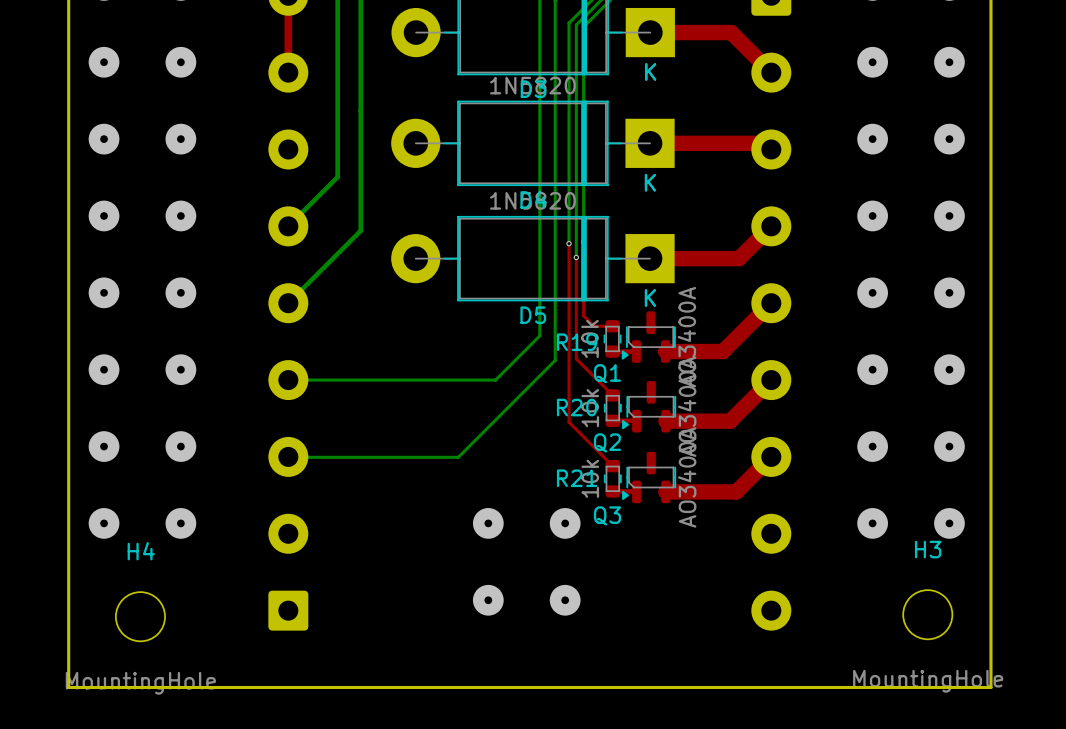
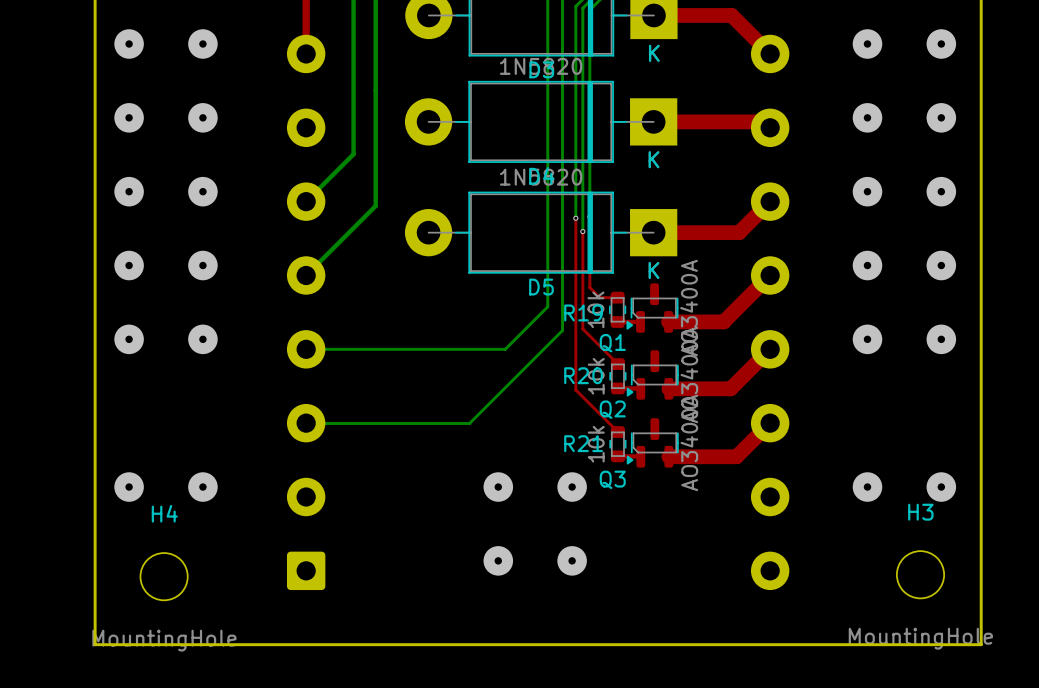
via: (104, 446) -> none
via: (180, 446) -> none
via: (872, 446) -> none
via: (949, 446) -> none

